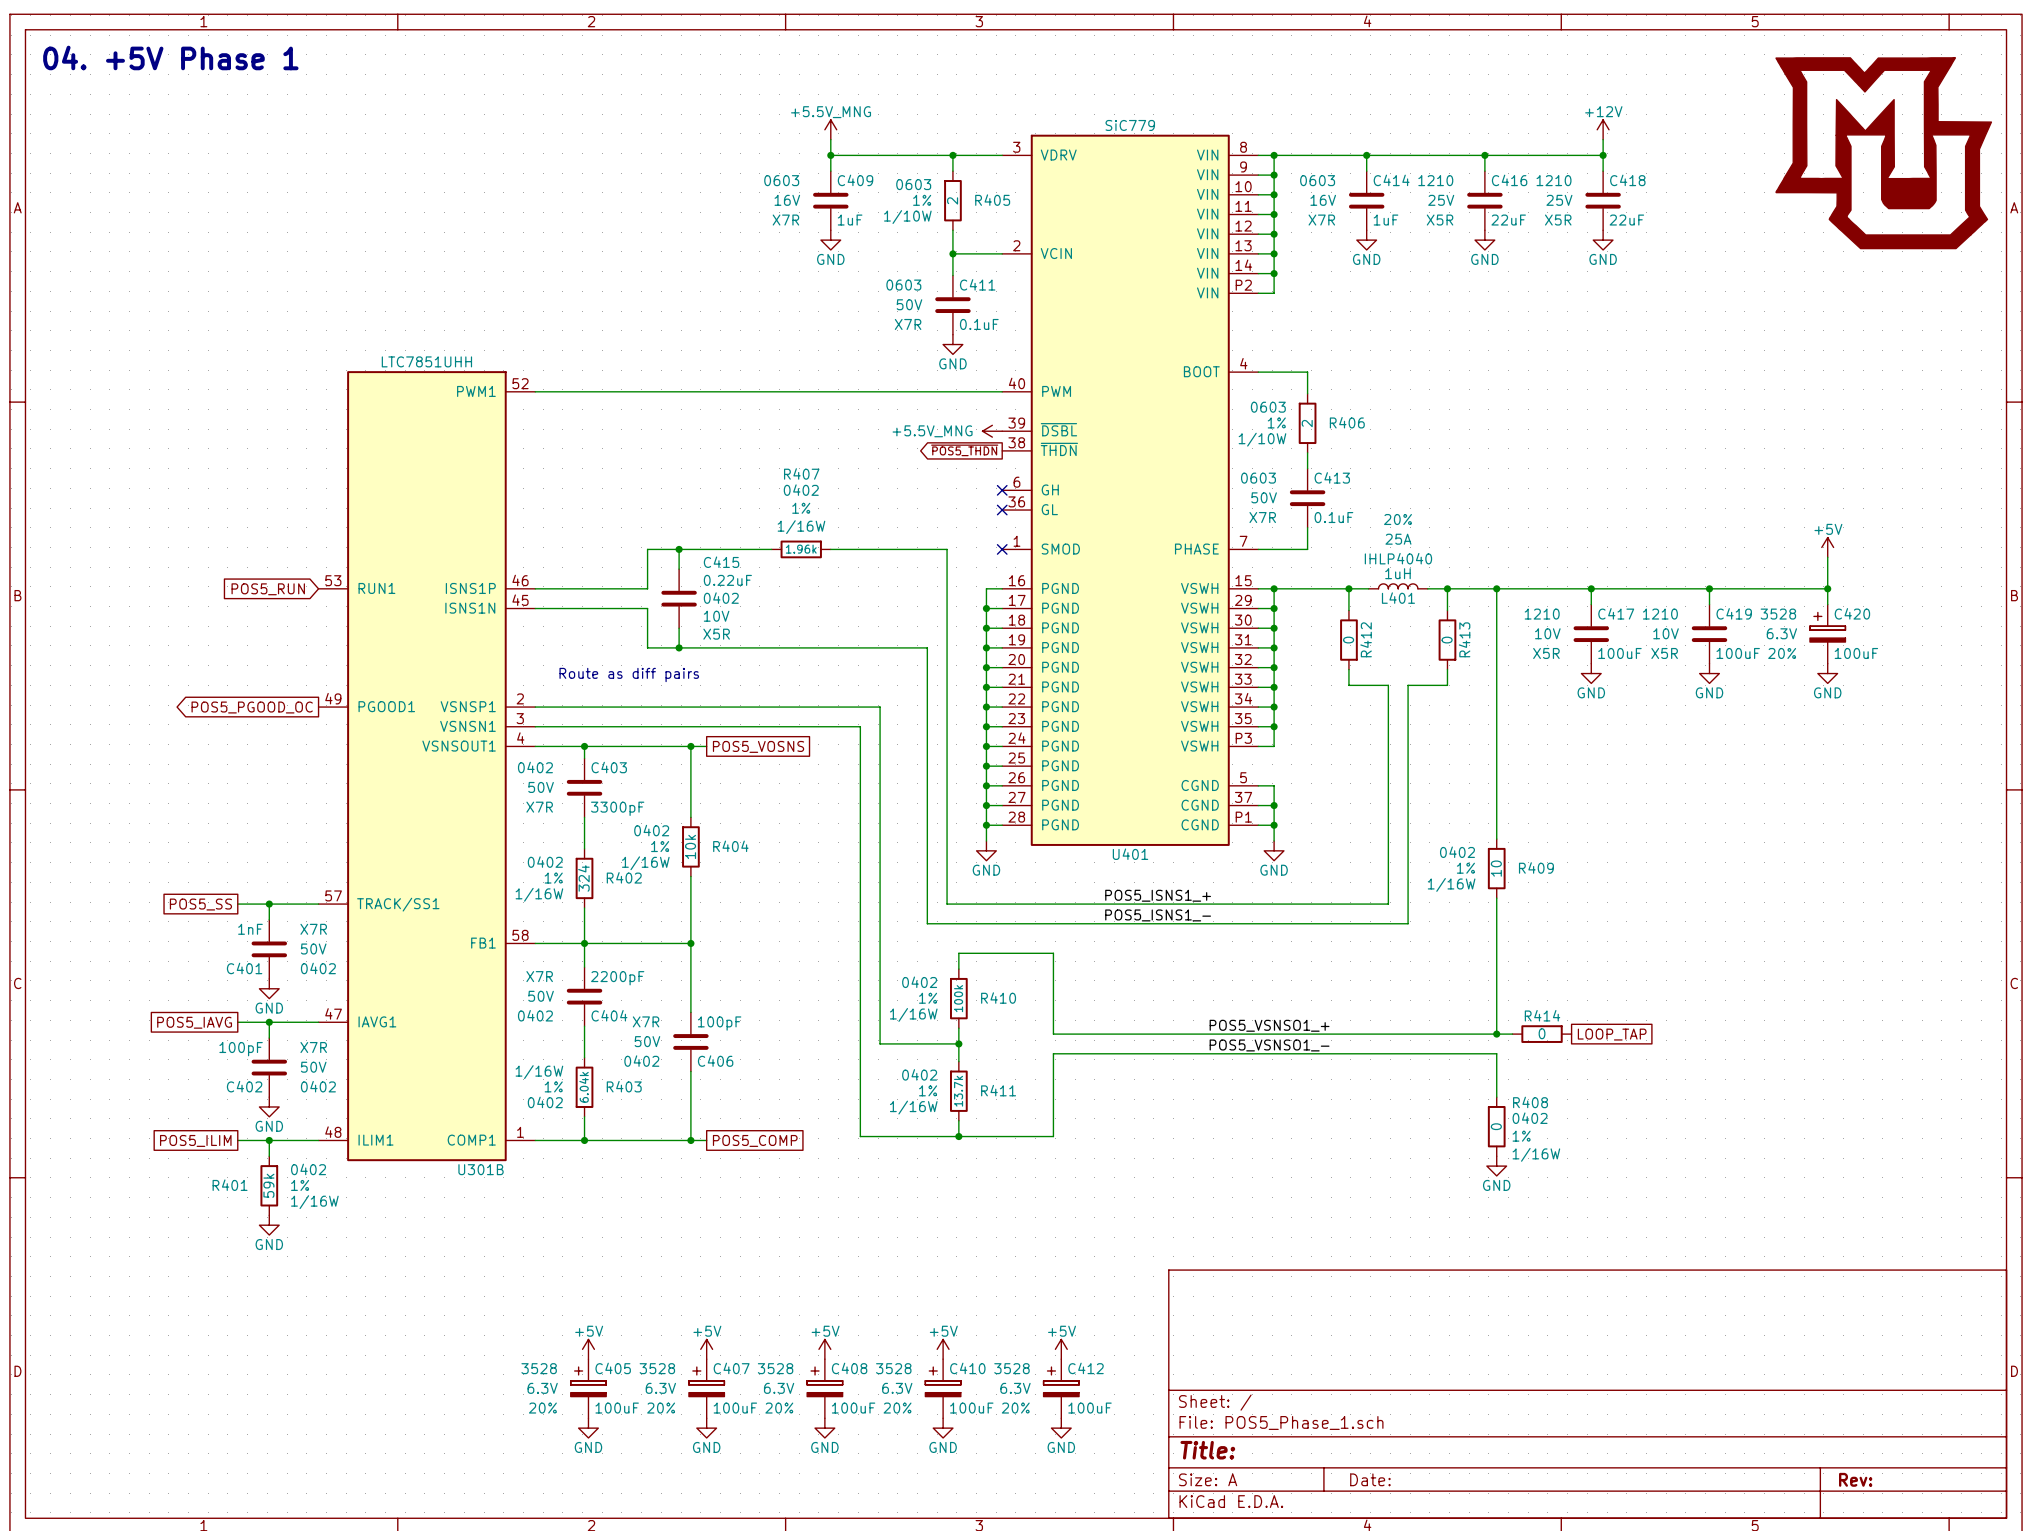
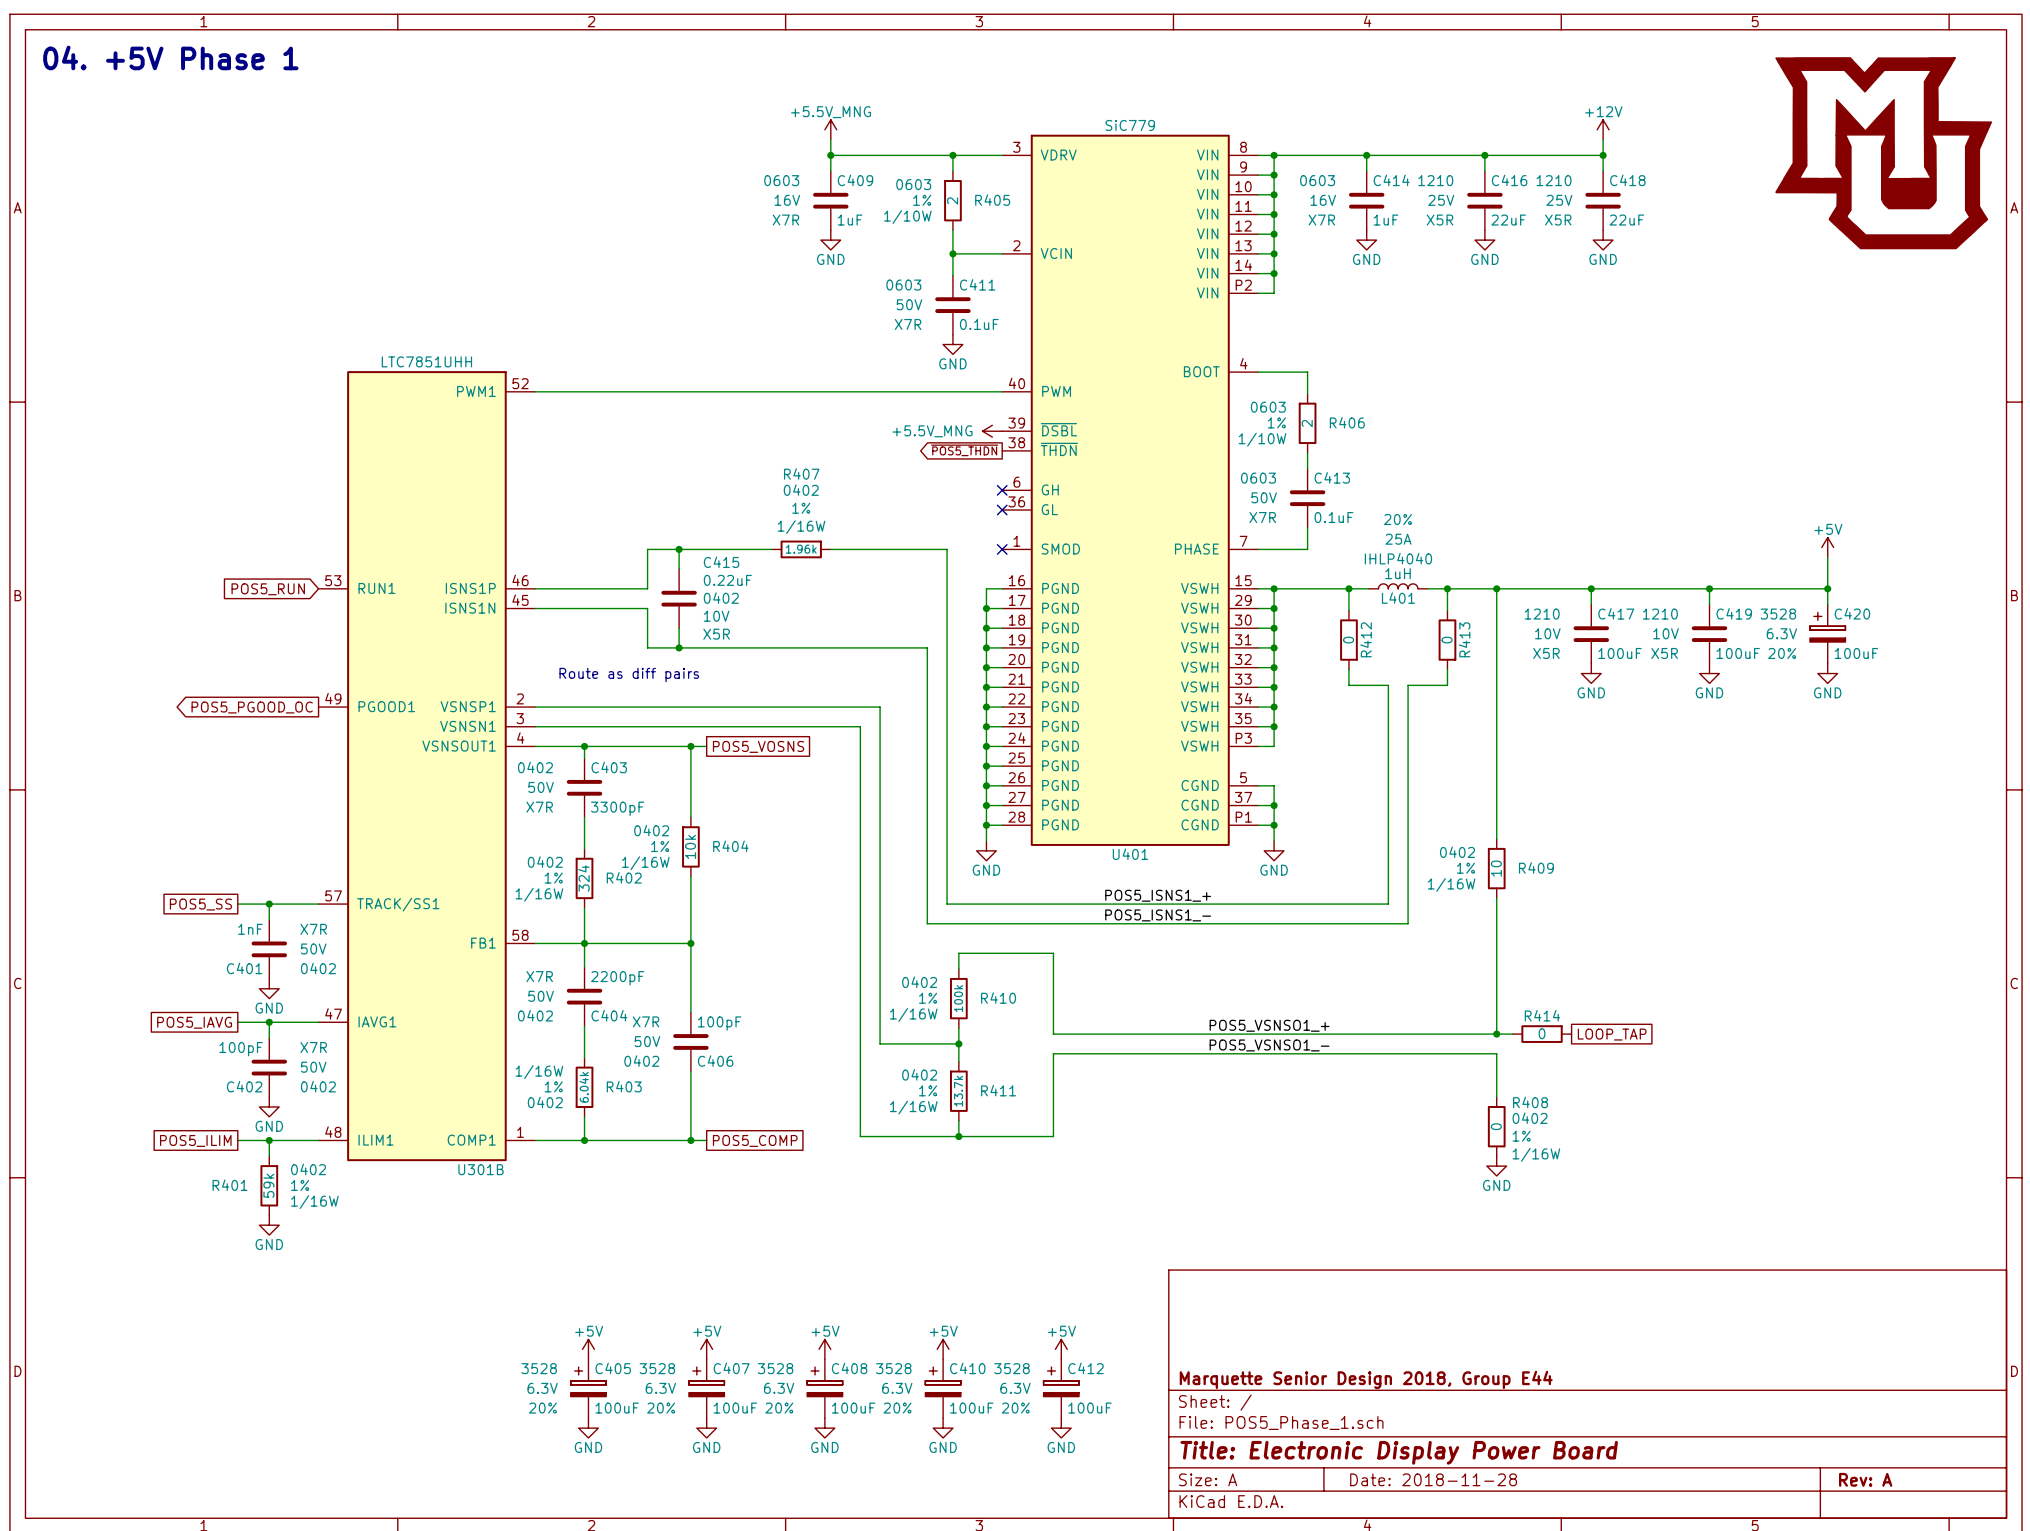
title block: none -> Marquette Senior Design 2018, Group E44 (1366, 1379)
title block: Title: (1207, 1450) -> Title: Electronic Display Power Board (1399, 1452)
title block: Date: (1370, 1479) -> Date: 2018-11-28 (1433, 1479)
title block: Rev: (1855, 1479) -> Rev: A (1865, 1479)

